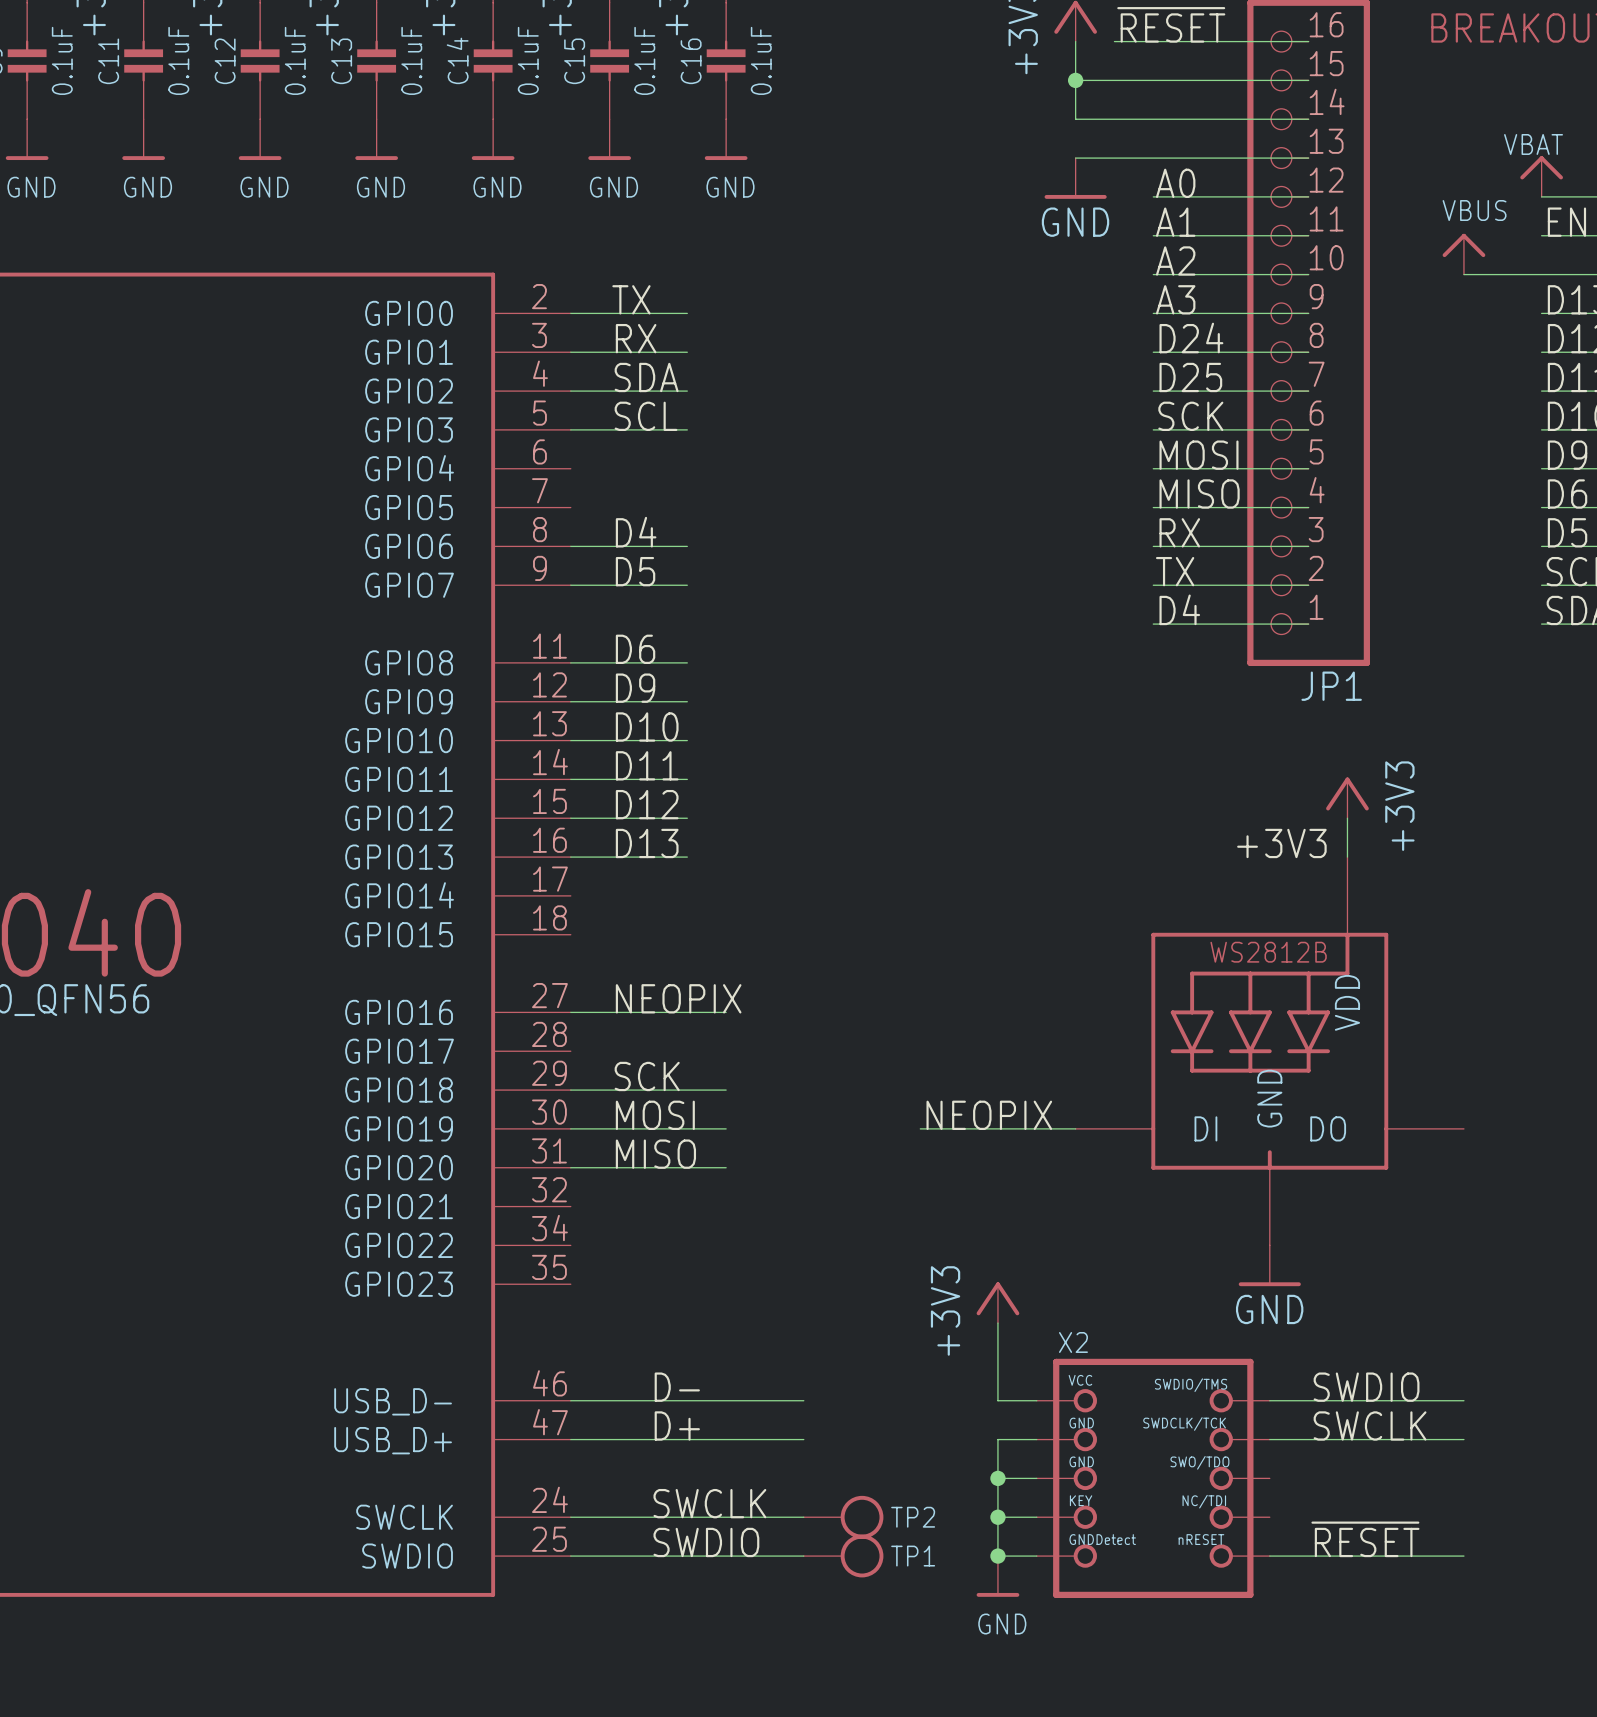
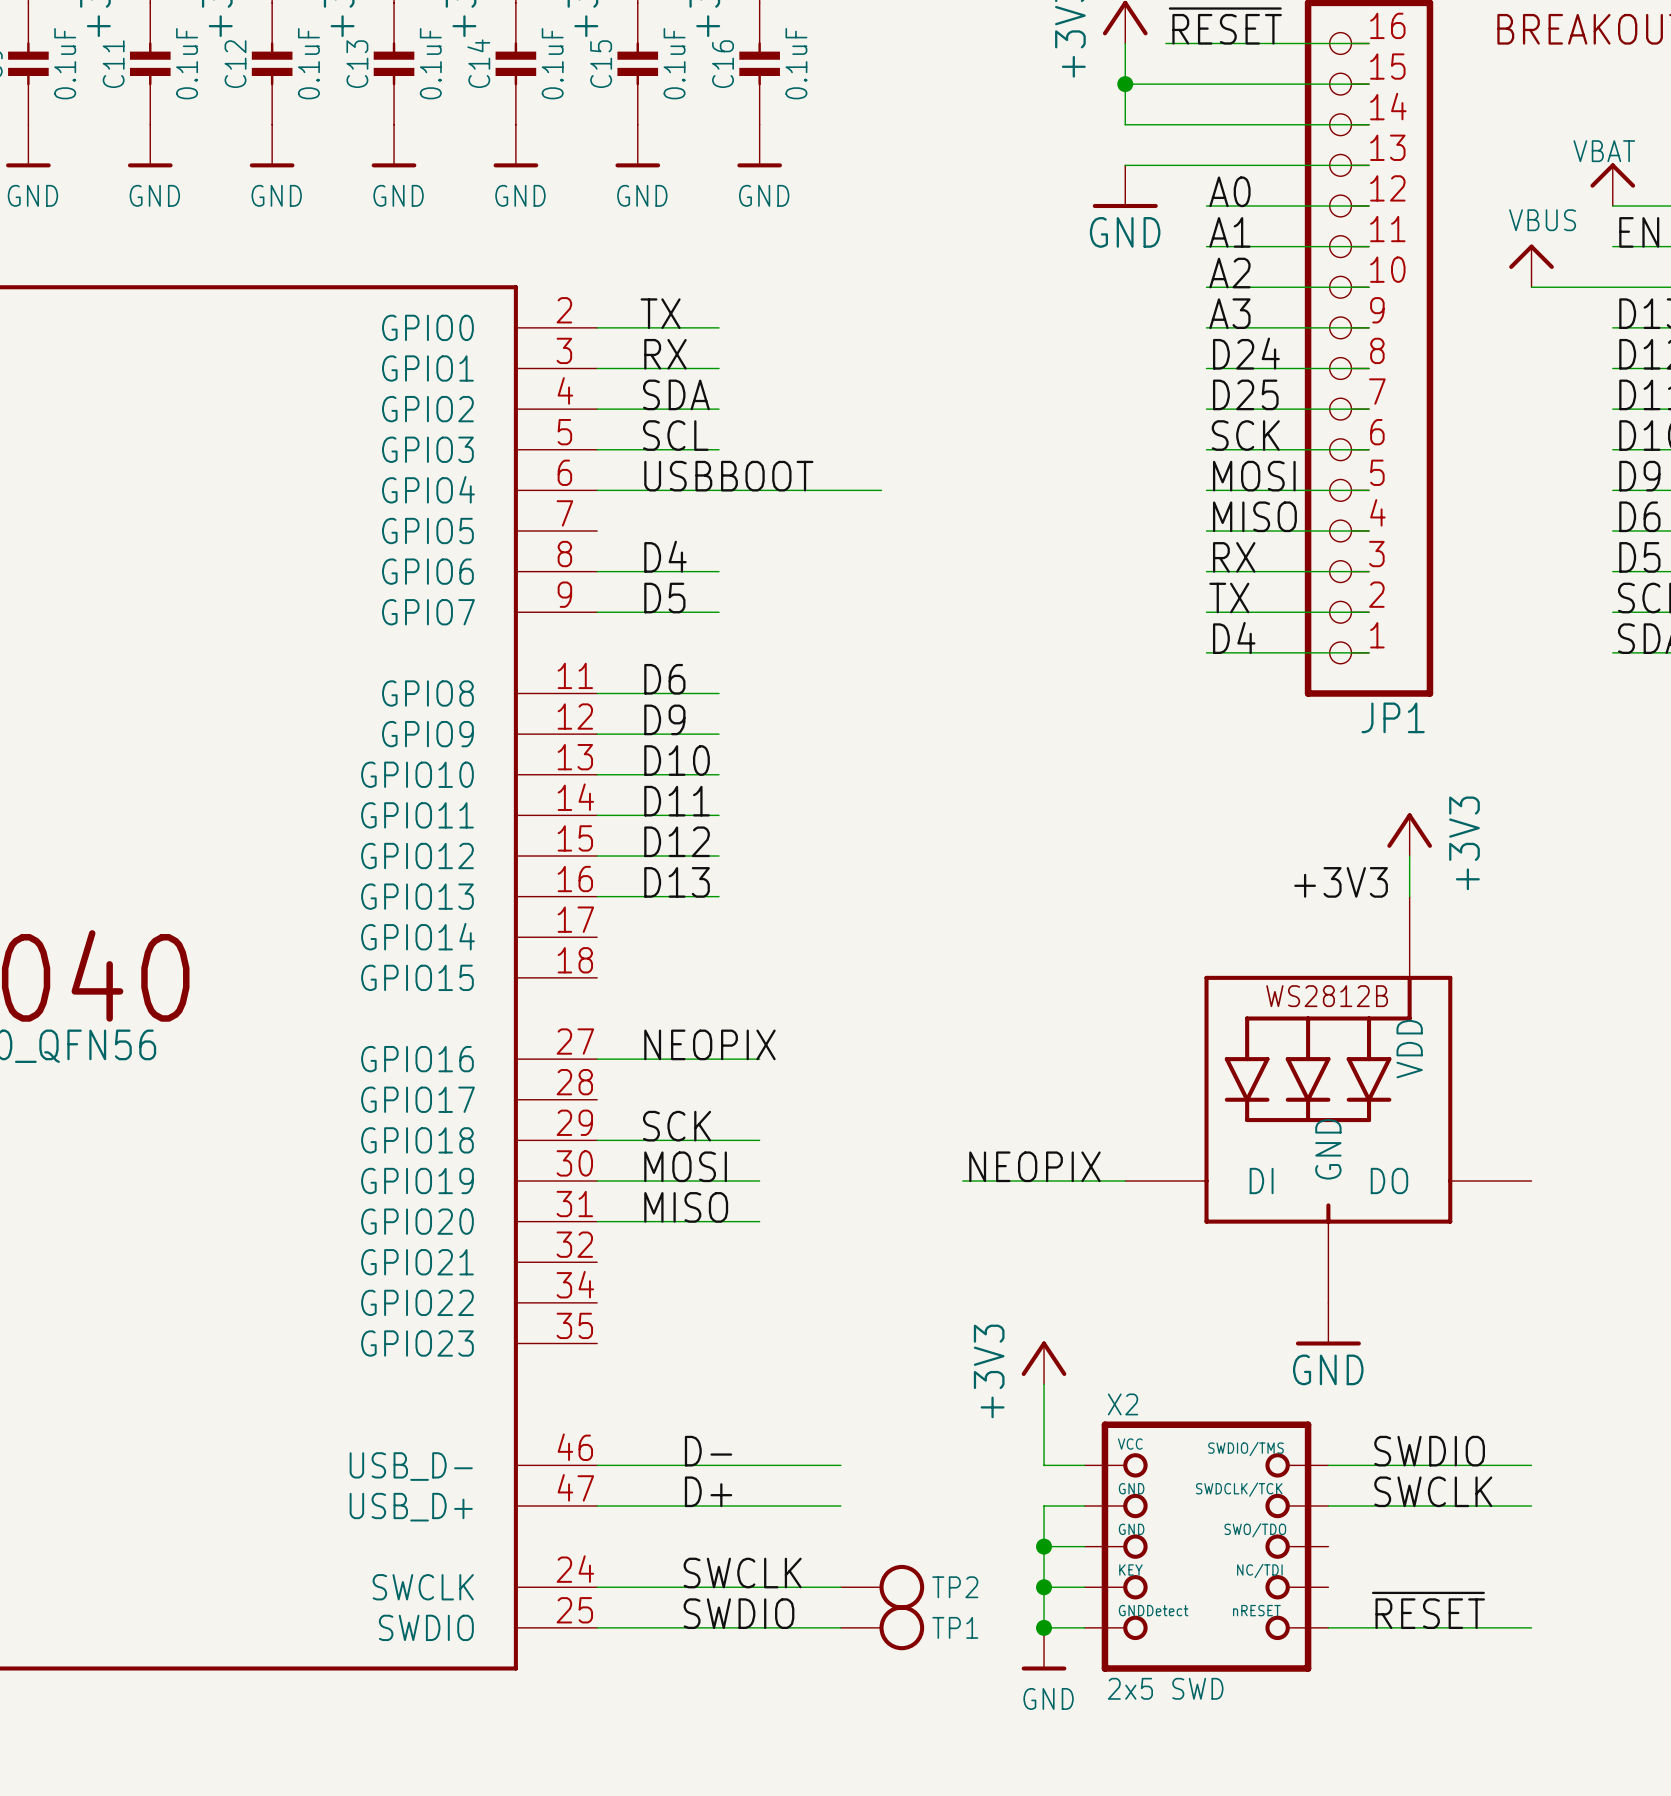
label: none -> USBBOOT (728, 476)
wire: none -> (597, 490) (881, 490)
X2 value: none -> 2x5 SWD (1165, 1688)

